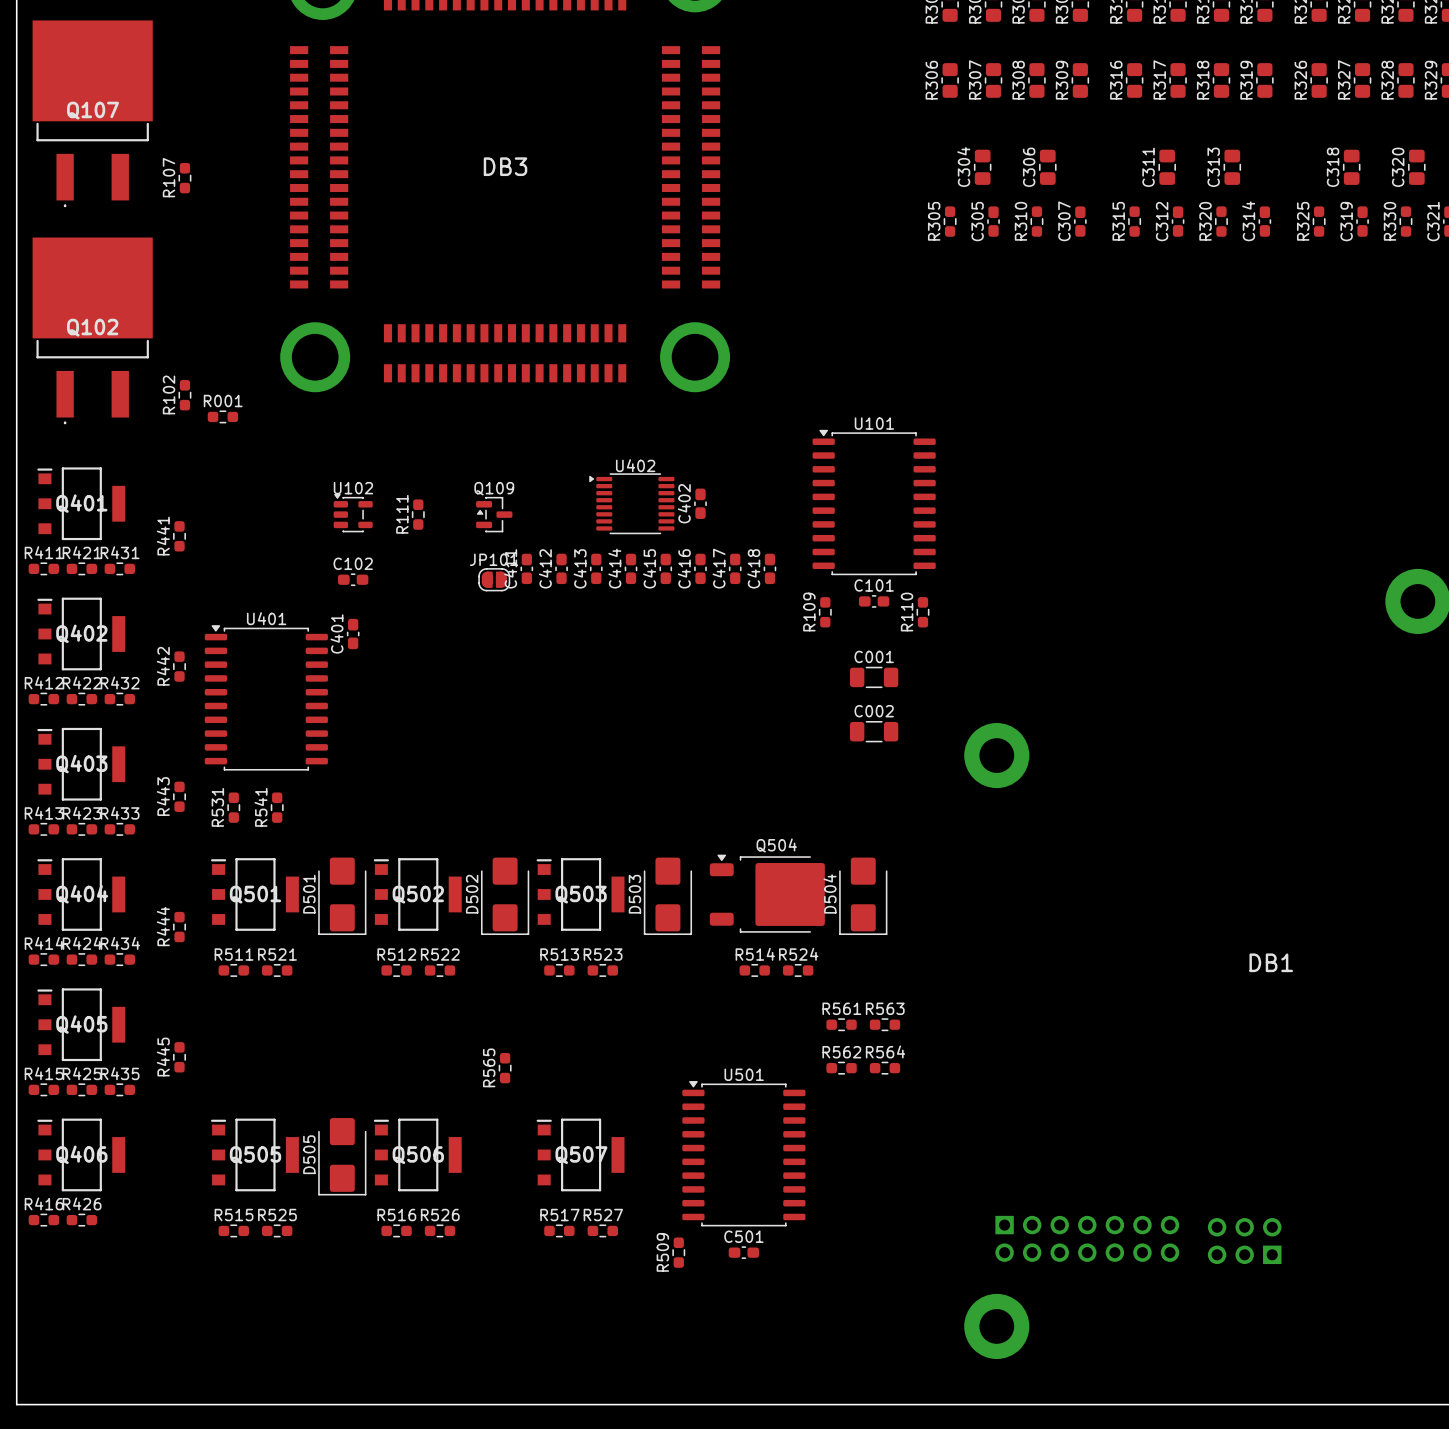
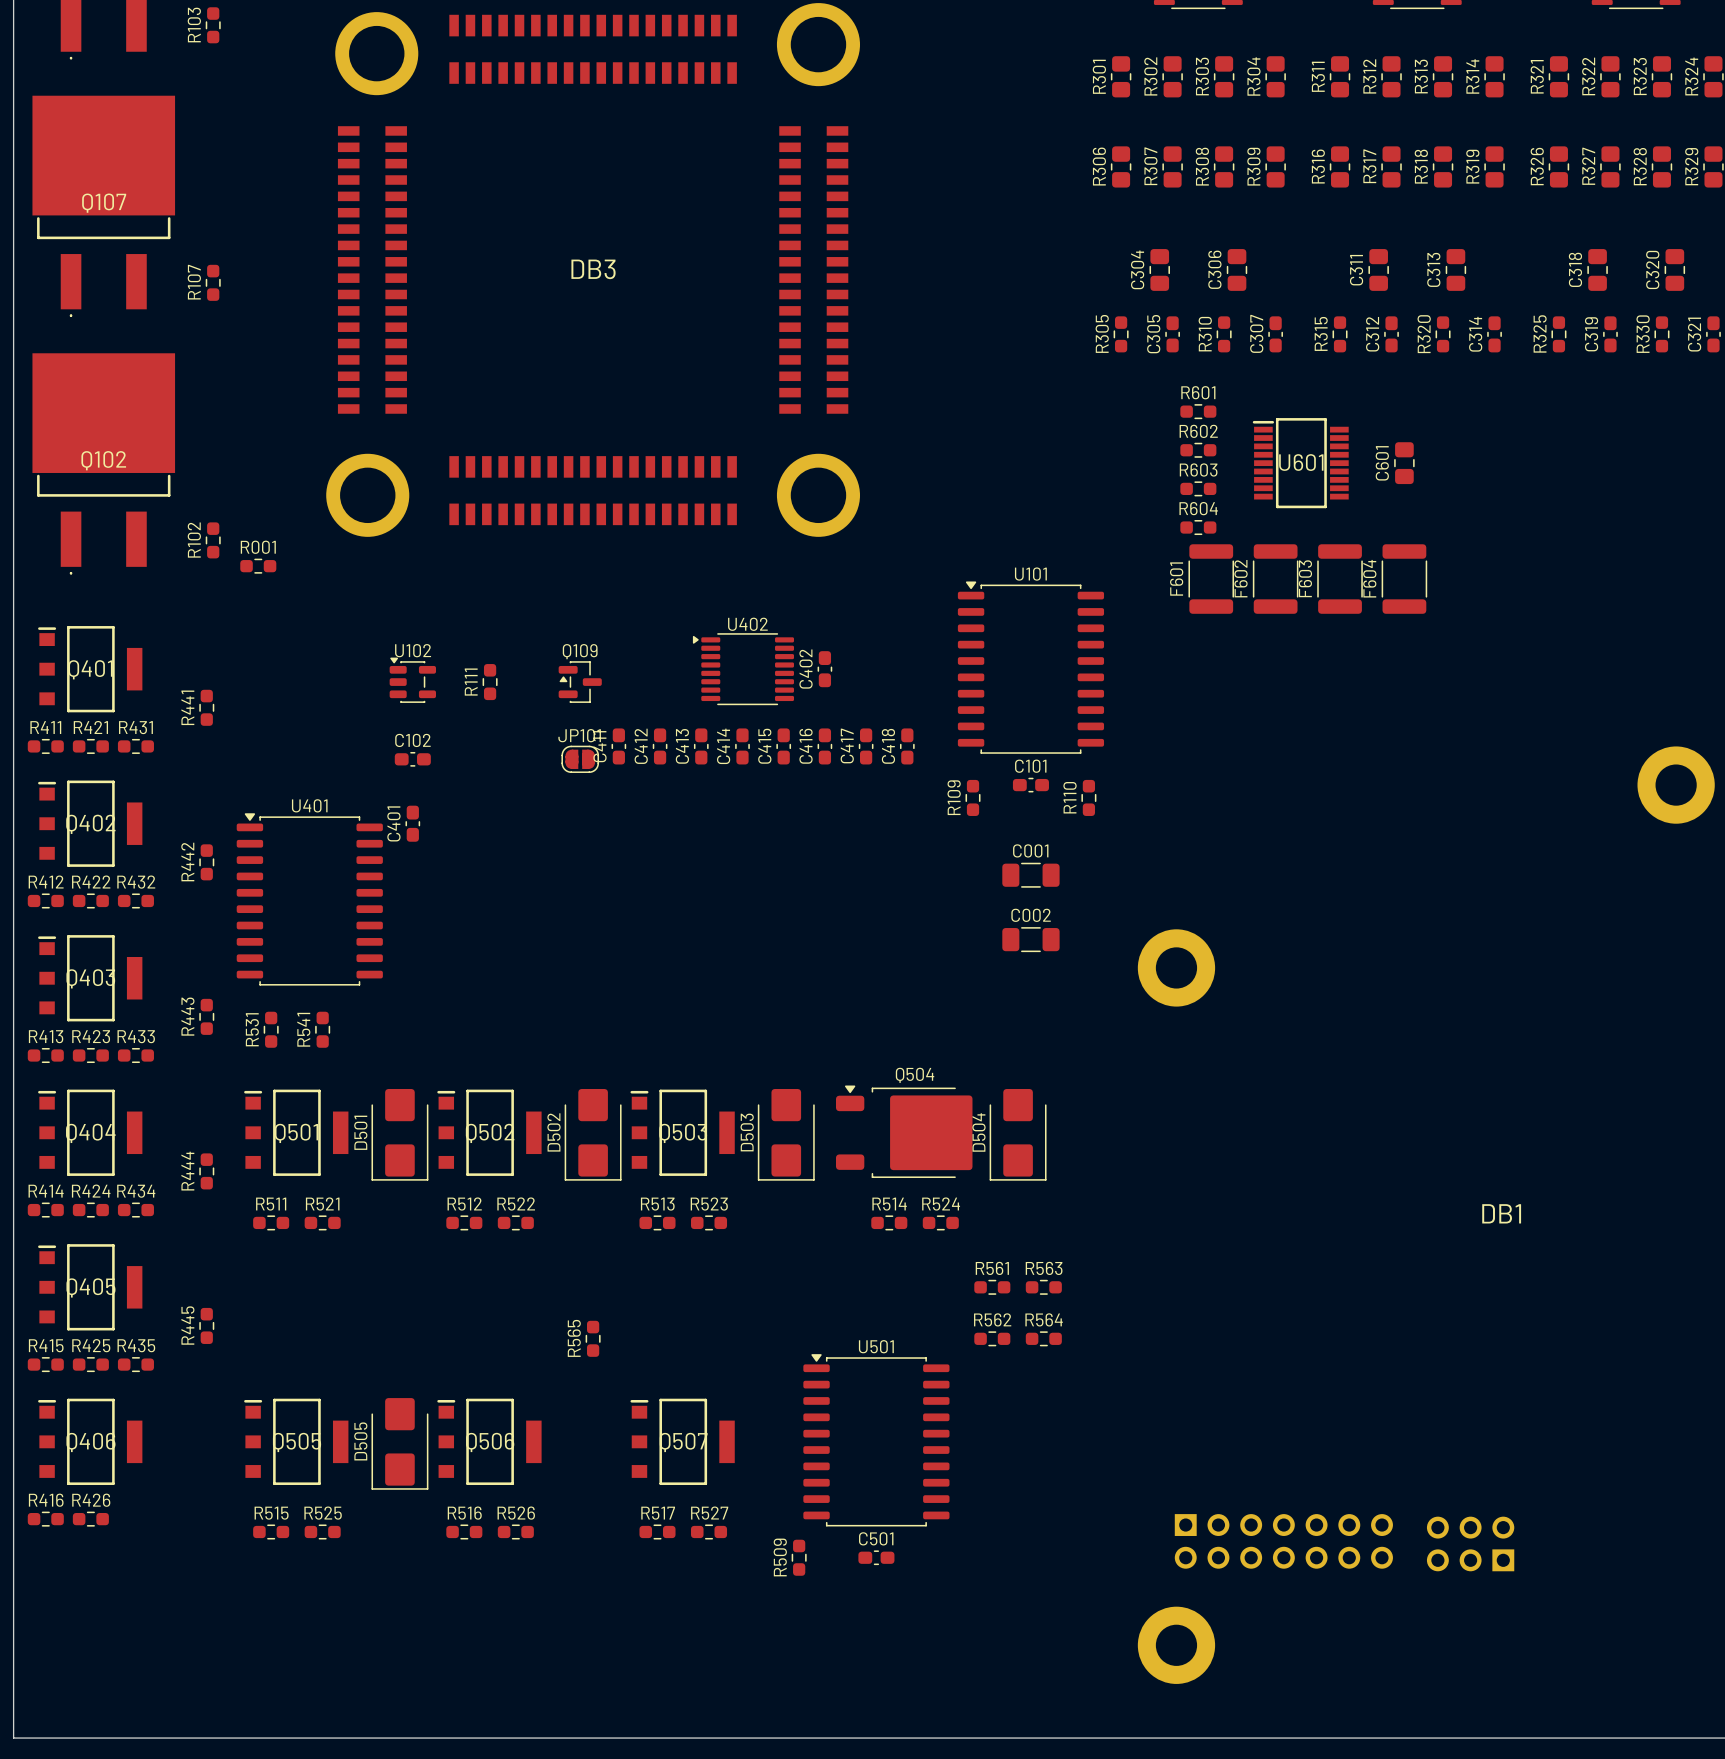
R601: none -> (1198, 411)
R602: none -> (1198, 450)
U601: none -> (1300, 463)
C601: none -> (1404, 463)
R603: none -> (1198, 488)
R604: none -> (1198, 527)
F601: none -> (1211, 579)
F602: none -> (1275, 579)
F603: none -> (1340, 579)
F604: none -> (1404, 579)

